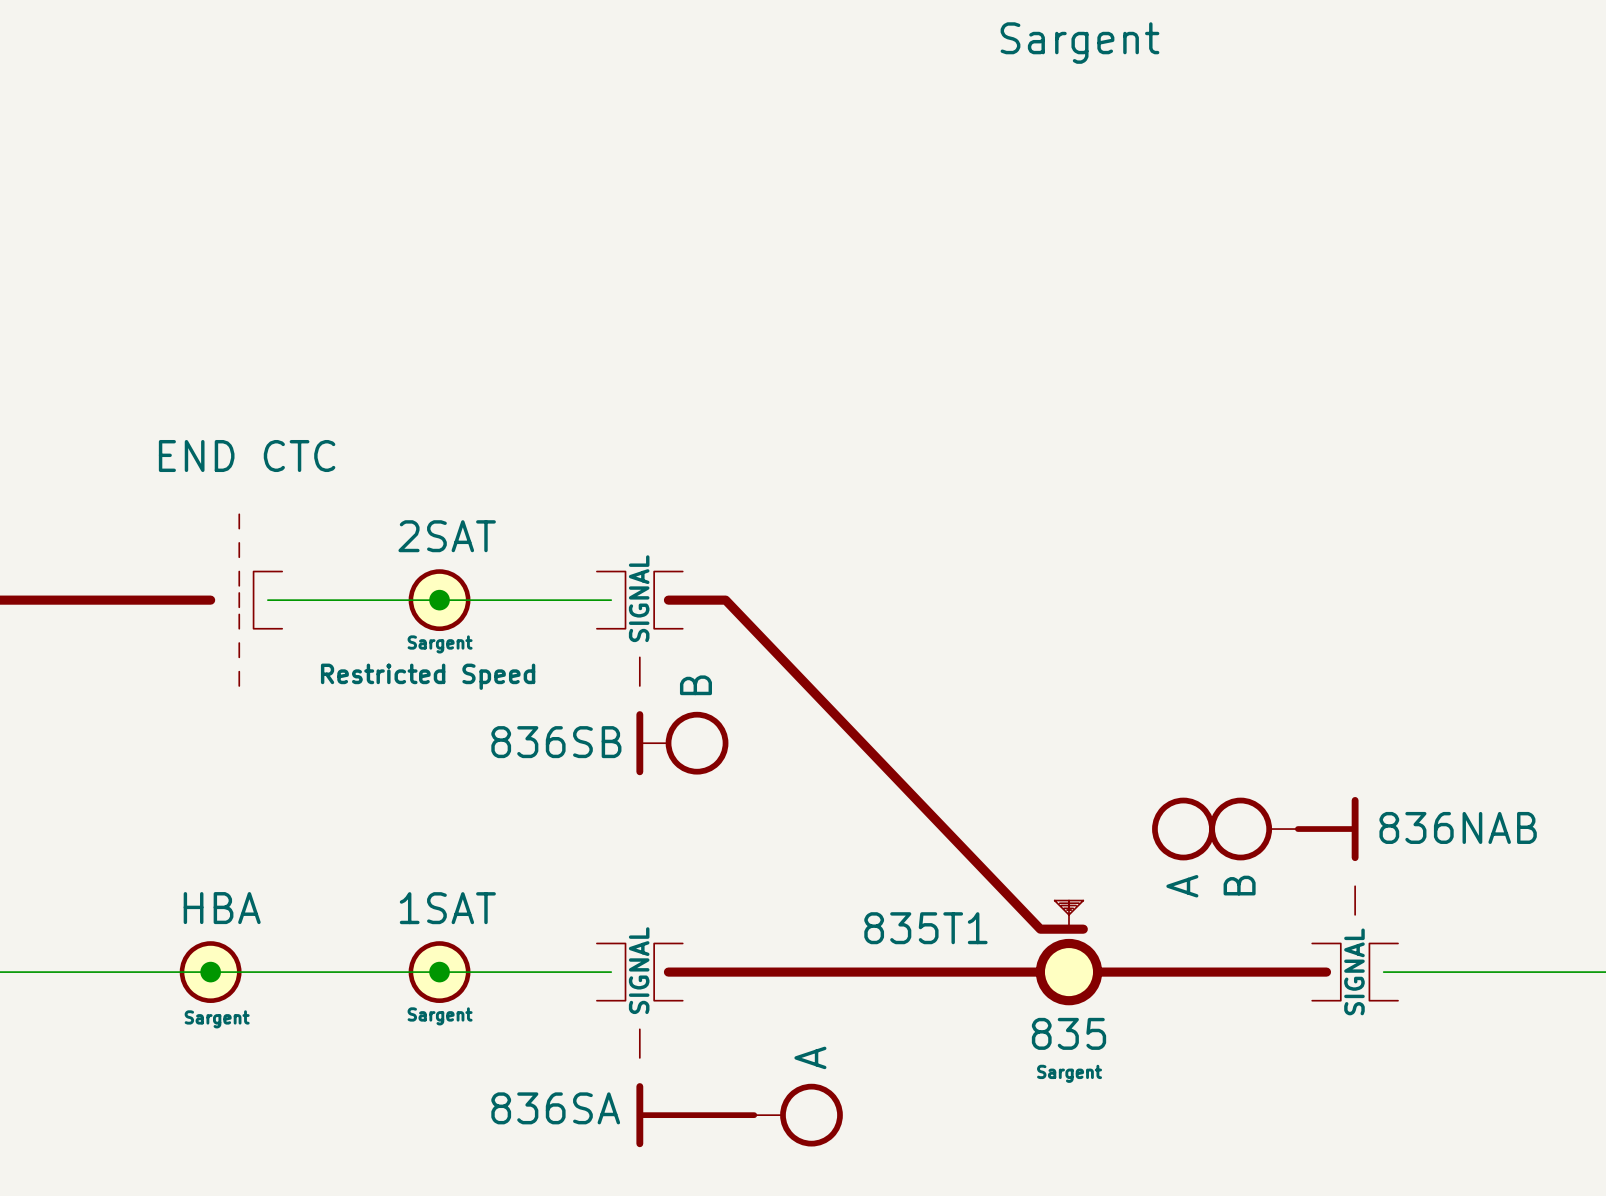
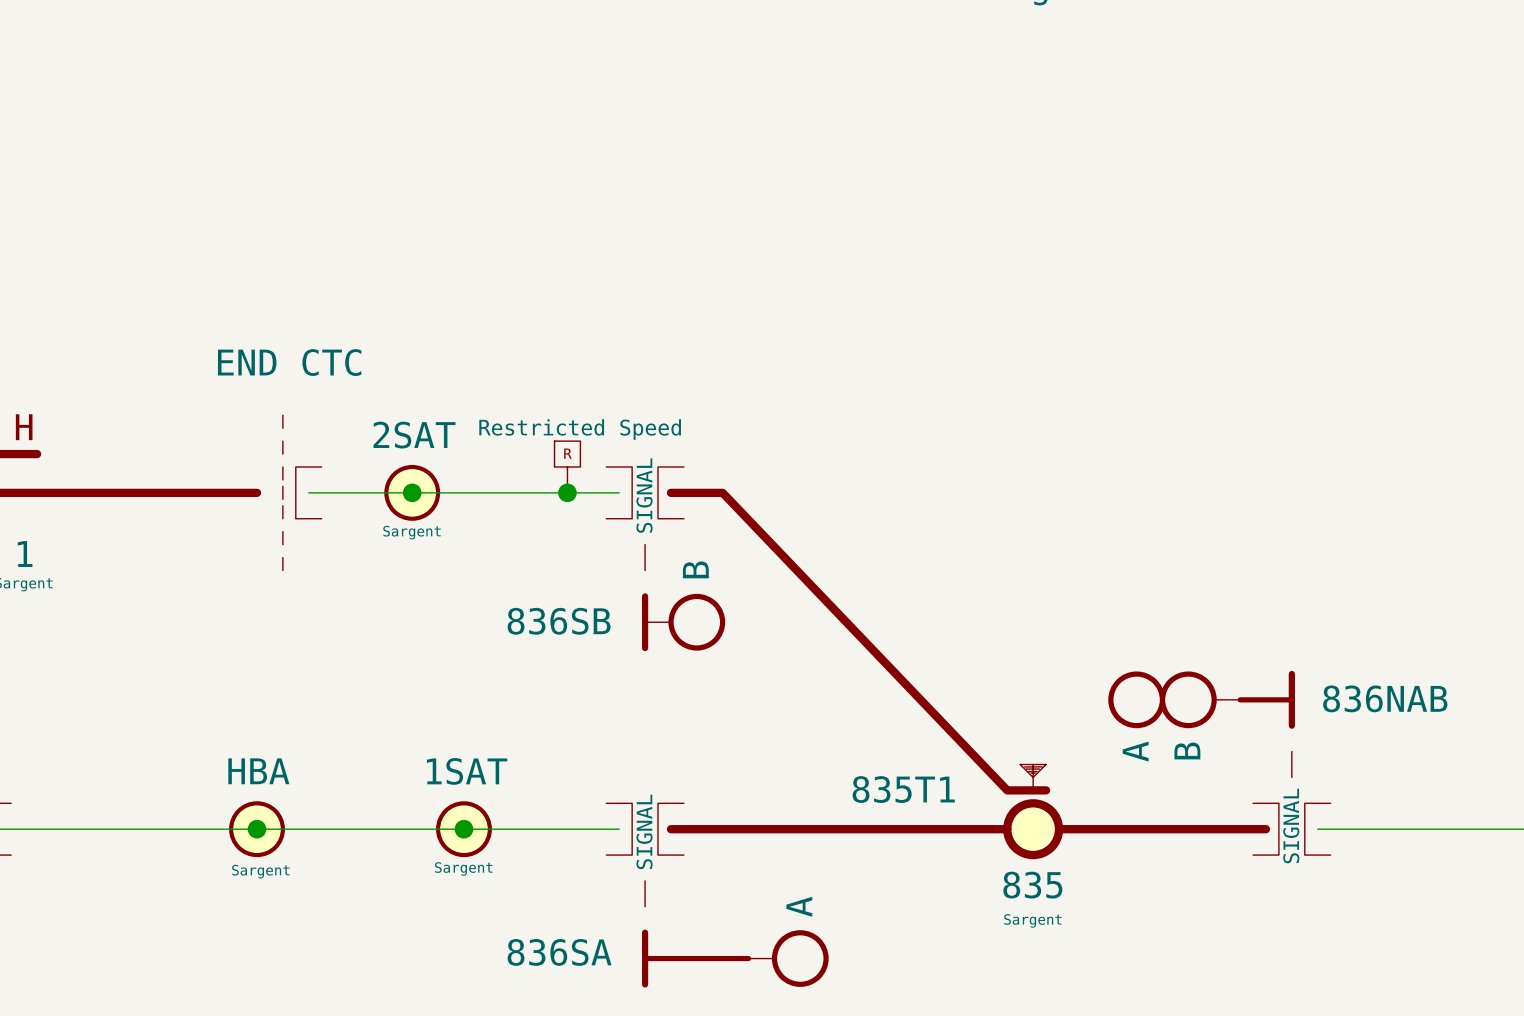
part: none -> Restricted Speed (567, 466)
junction: none -> (412, 492)
junction: (439, 600) -> none
part position: (439, 600) -> (412, 492)
junction: none -> (567, 492)
part: Restricted Speed (428, 676) -> none

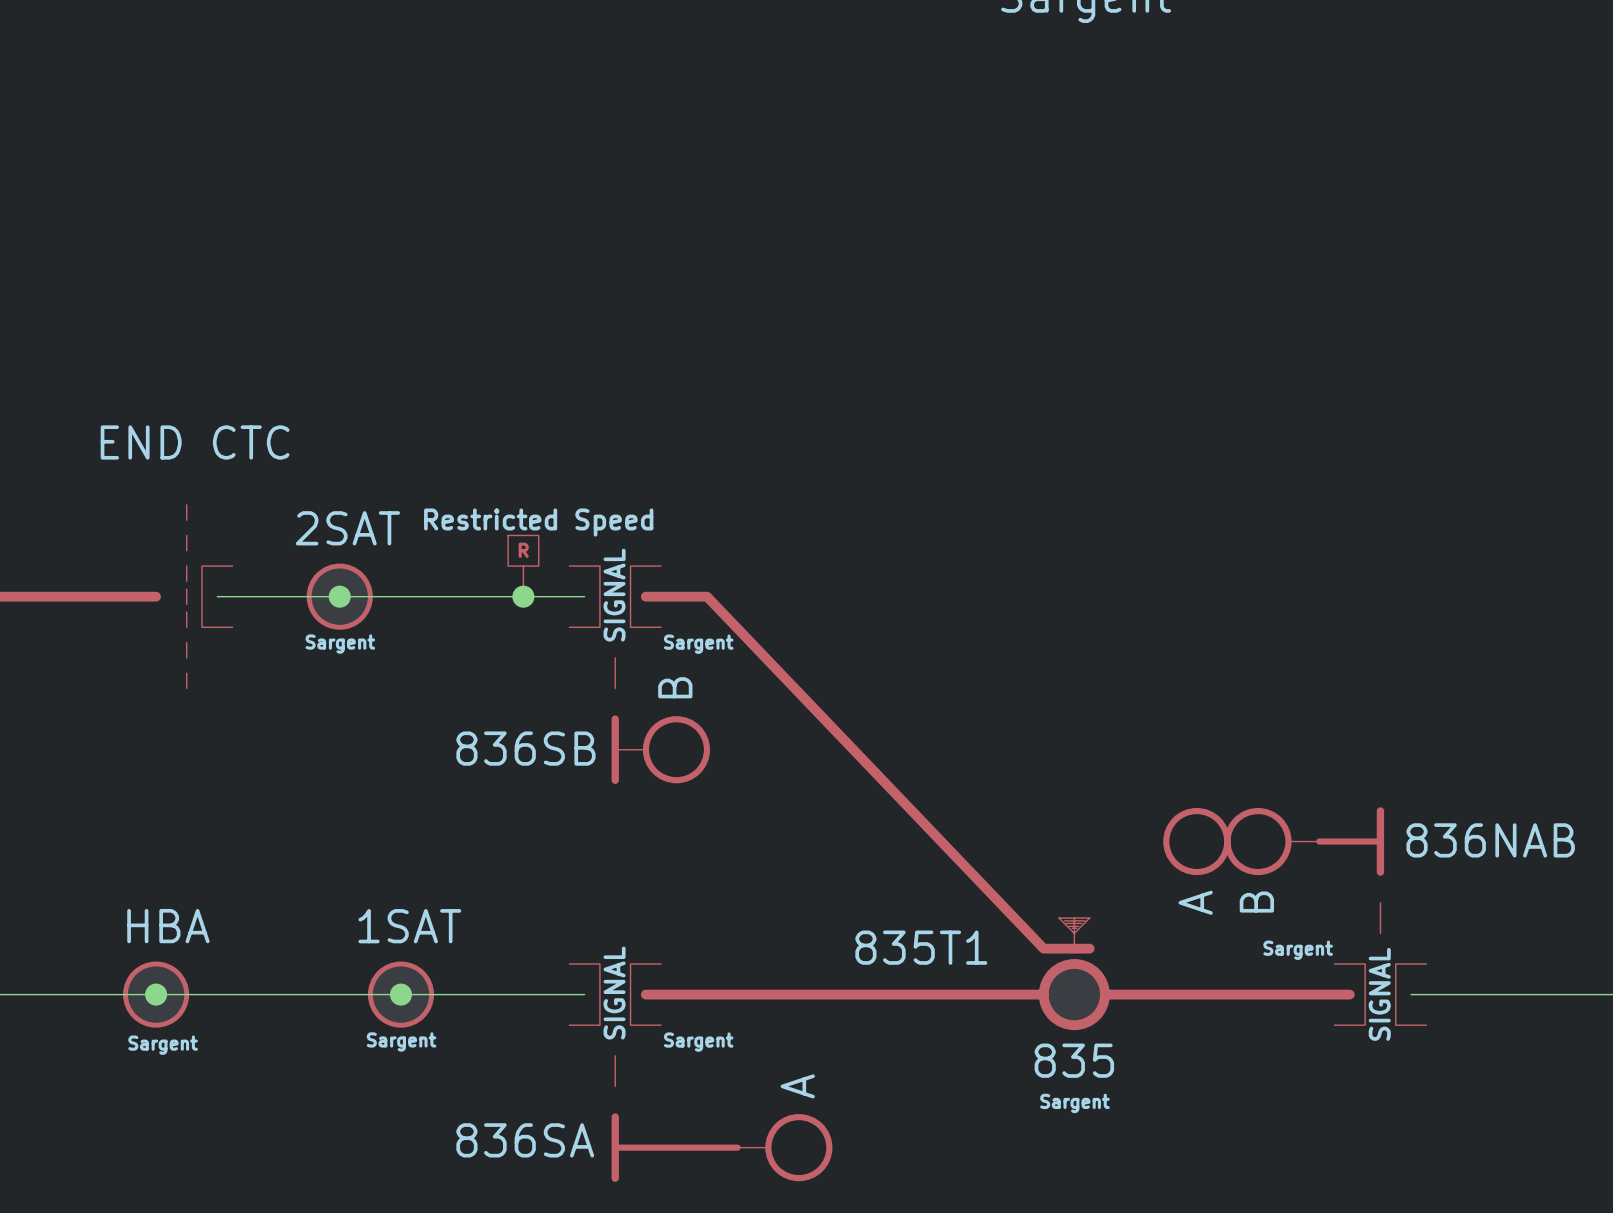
part text: none -> Sargent (698, 644)
part text: none -> Sargent (1298, 950)
part text: none -> Sargent (698, 1042)

